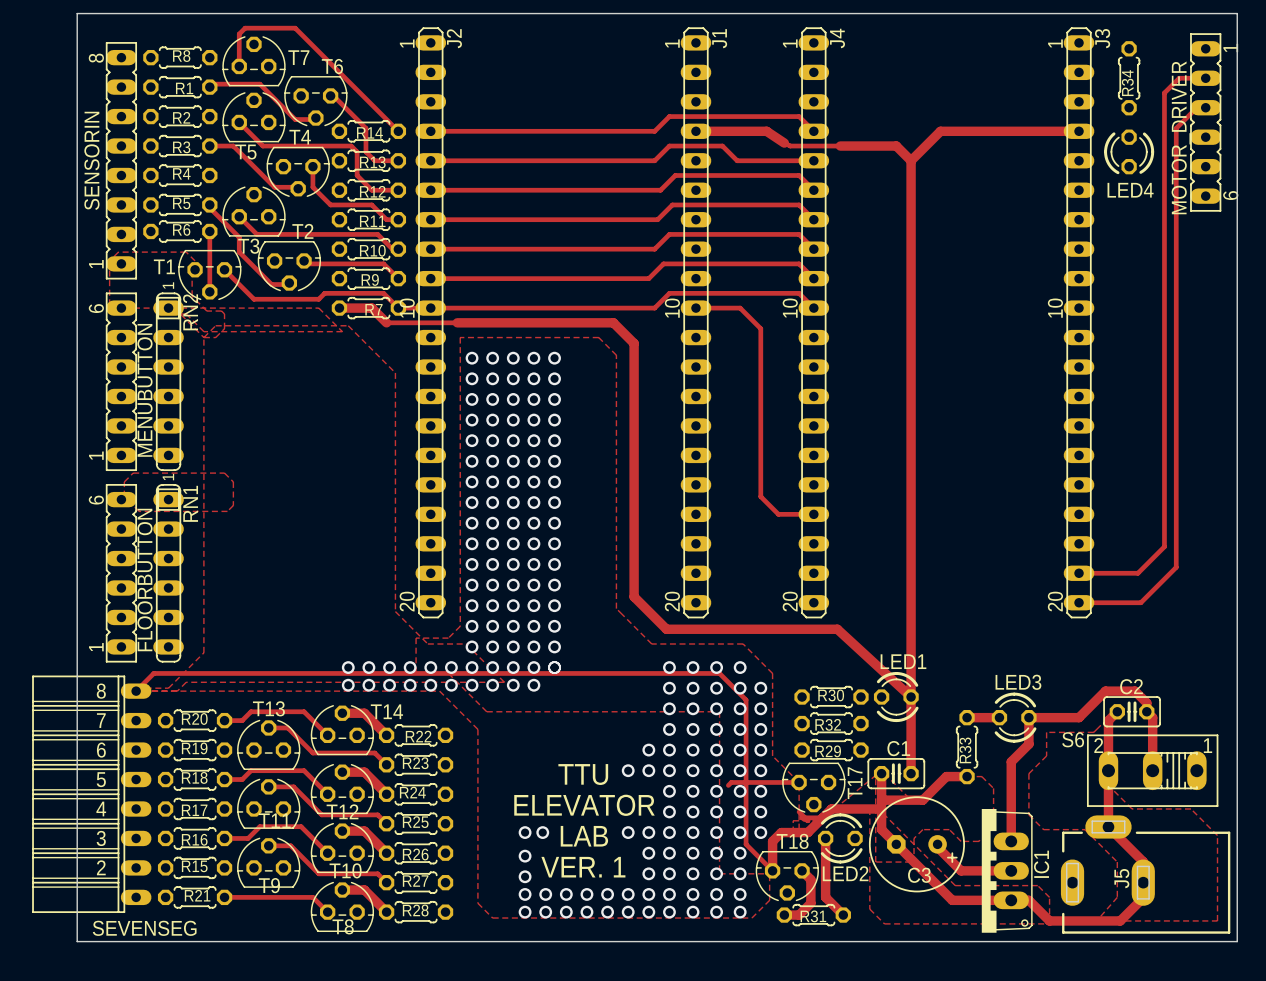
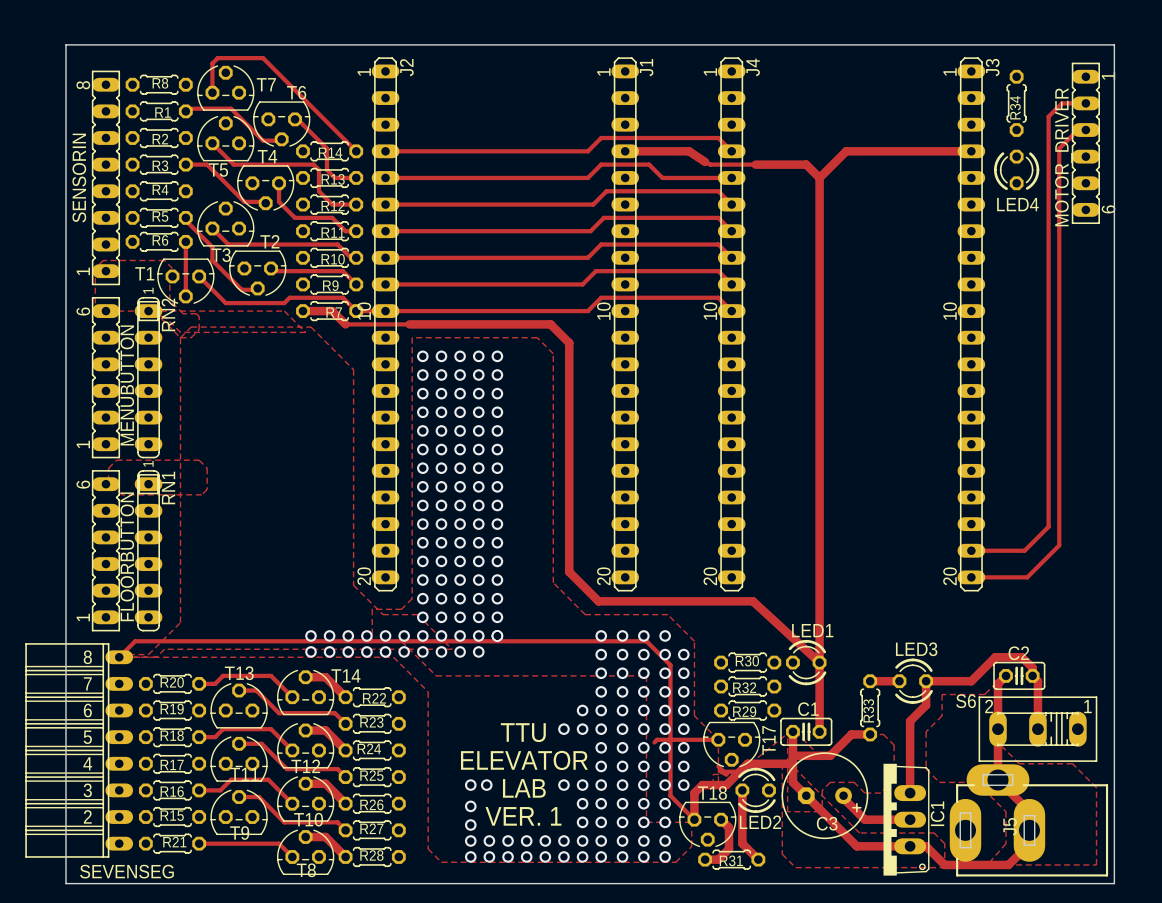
track: (695, 308) (740, 308) (760, 328) (760, 496) (778, 514) (813, 514) -> none
J5 footprint: [1060, 815, 1231, 934] -> [949, 764, 1109, 877]

